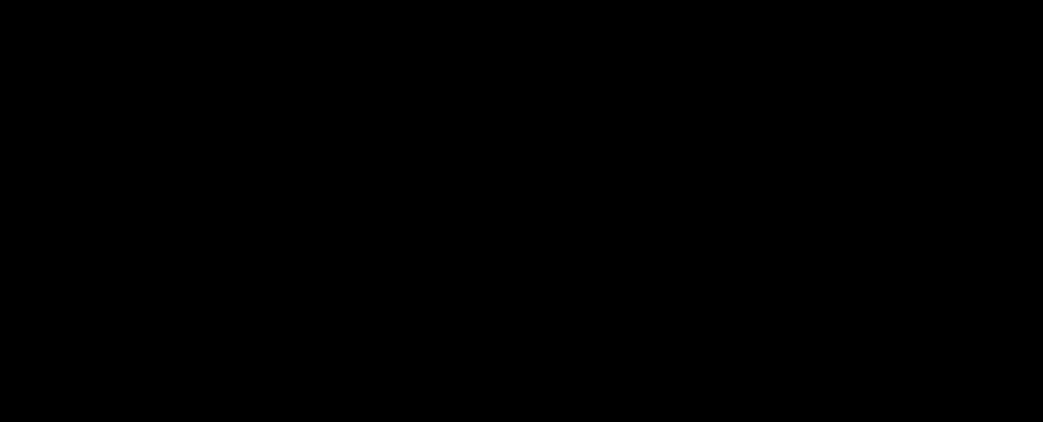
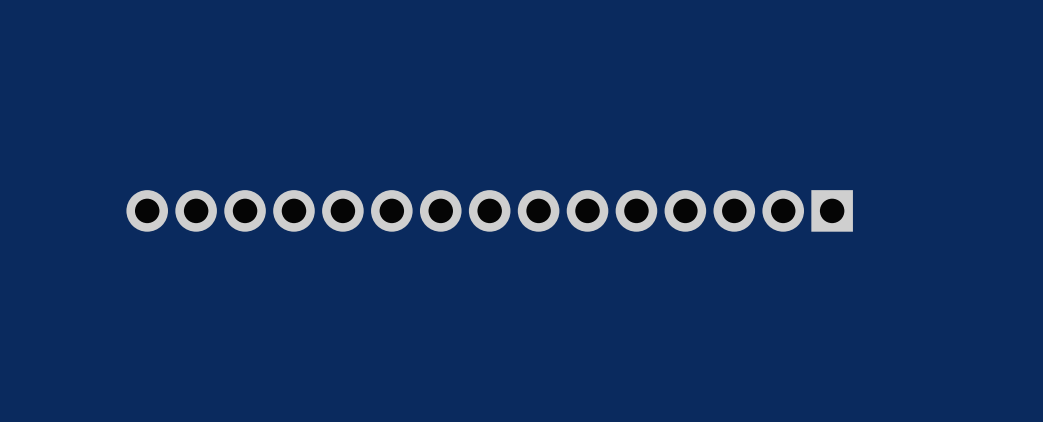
part: none -> (489, 210)

